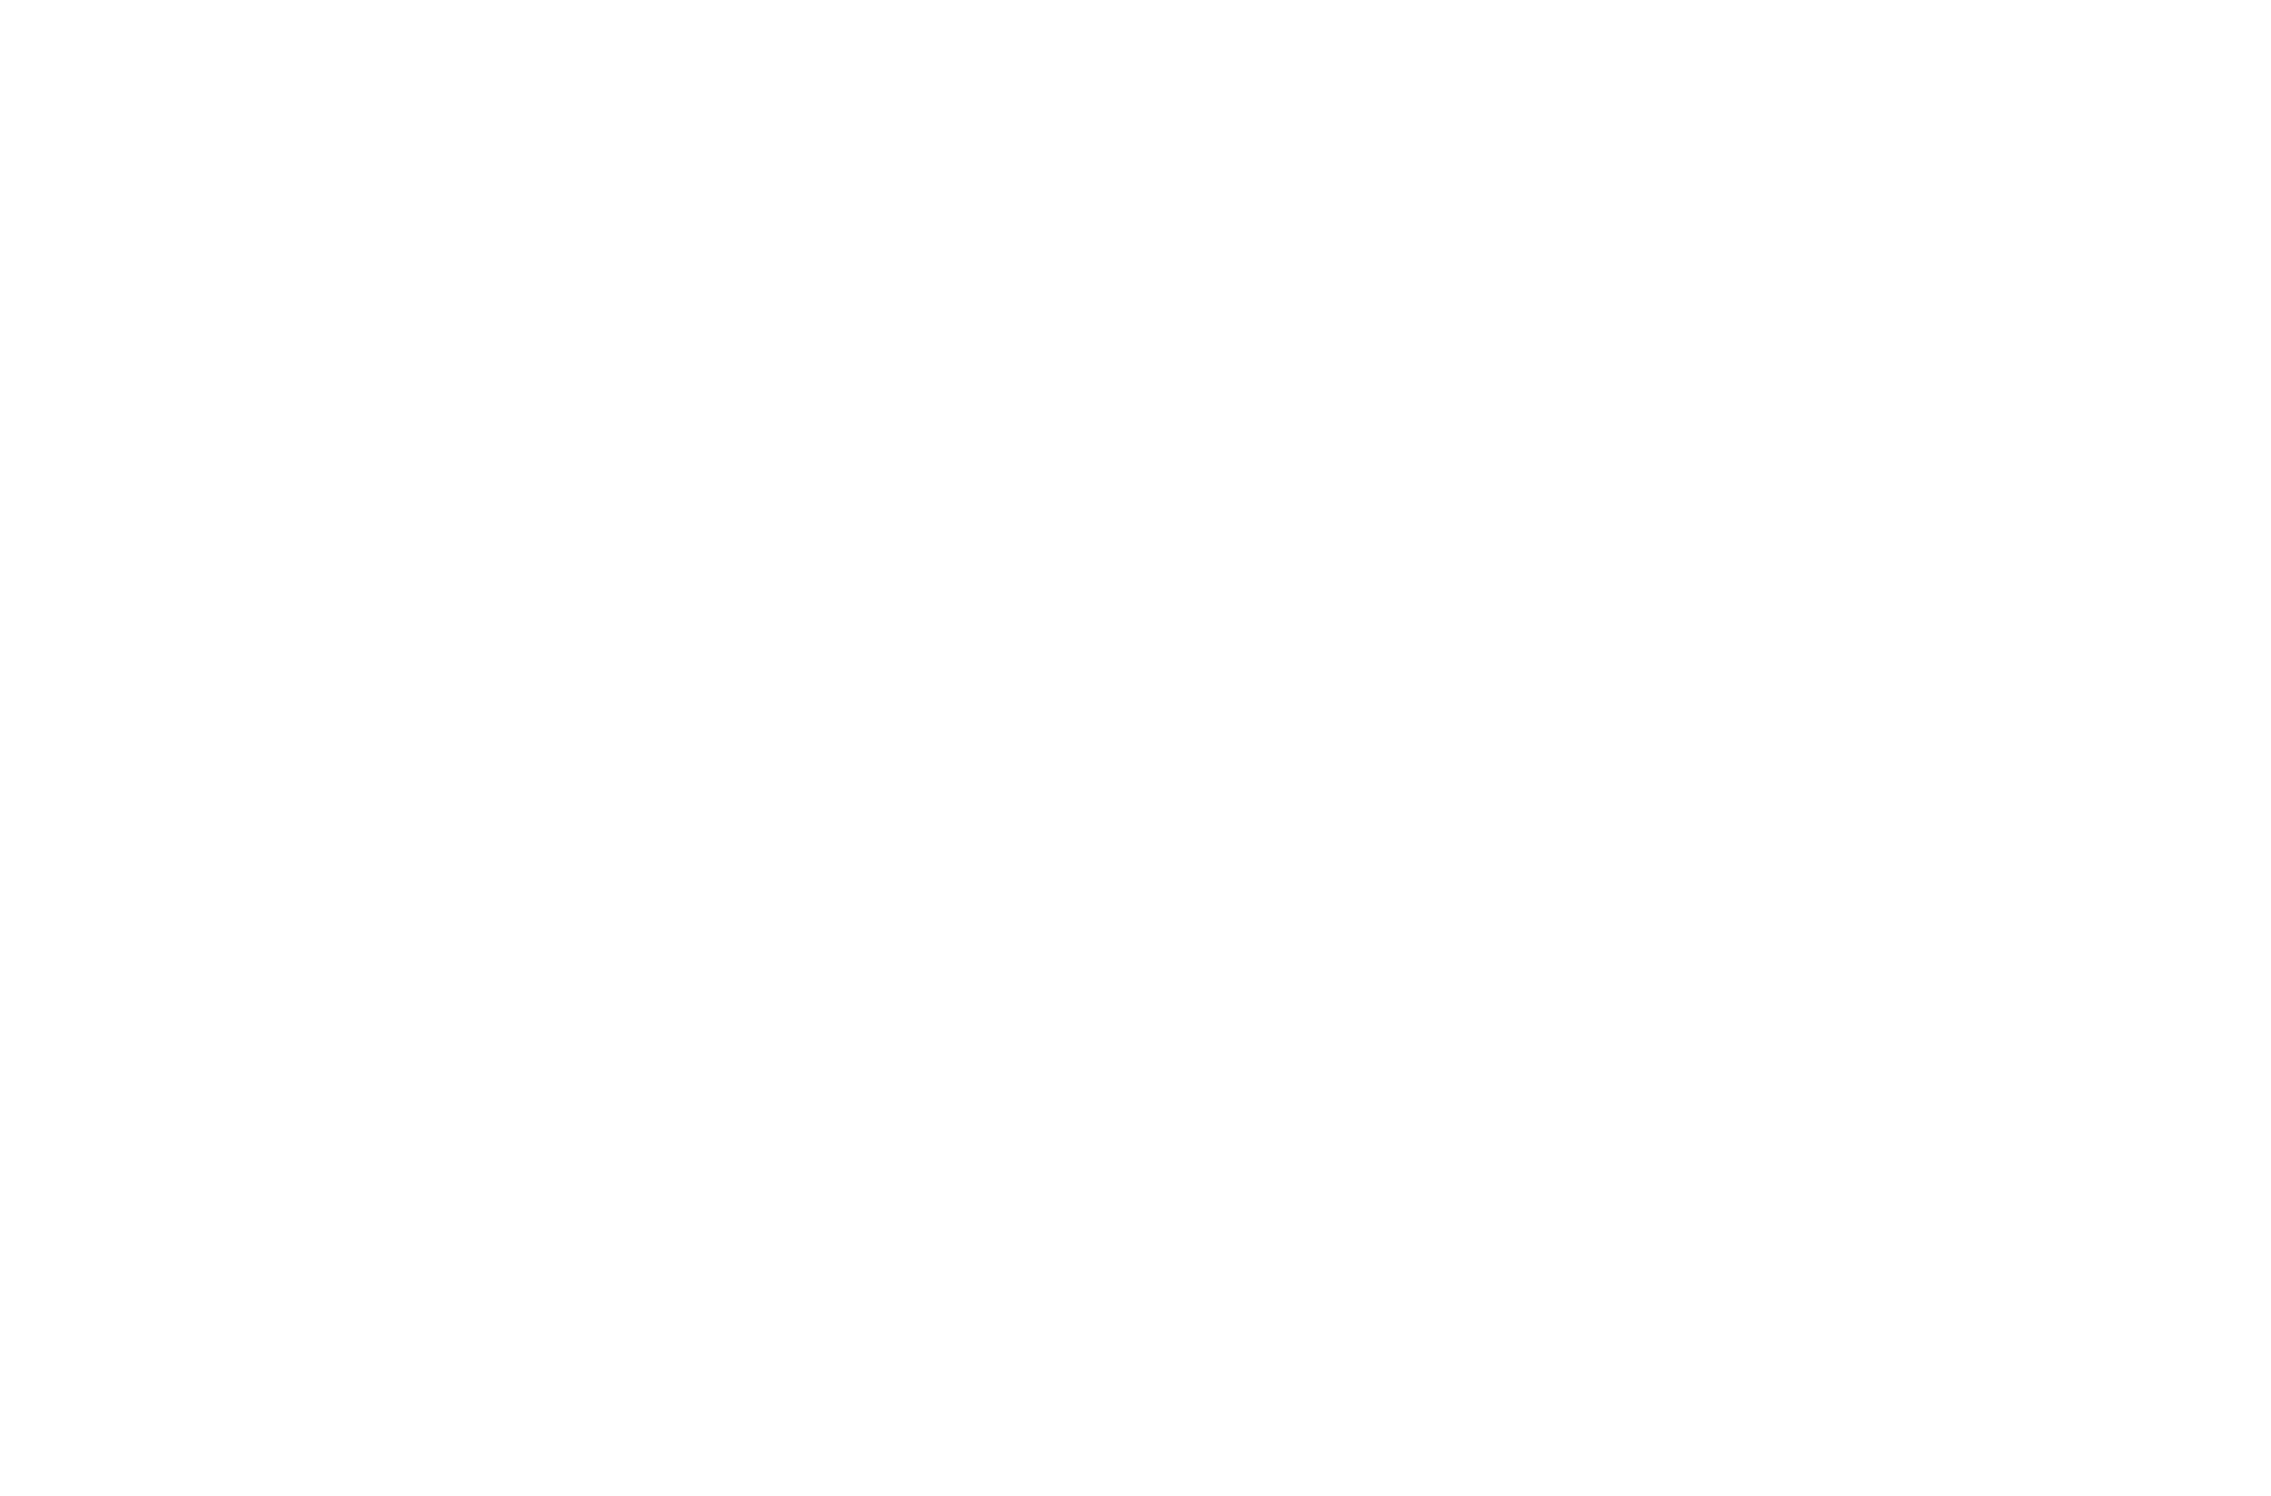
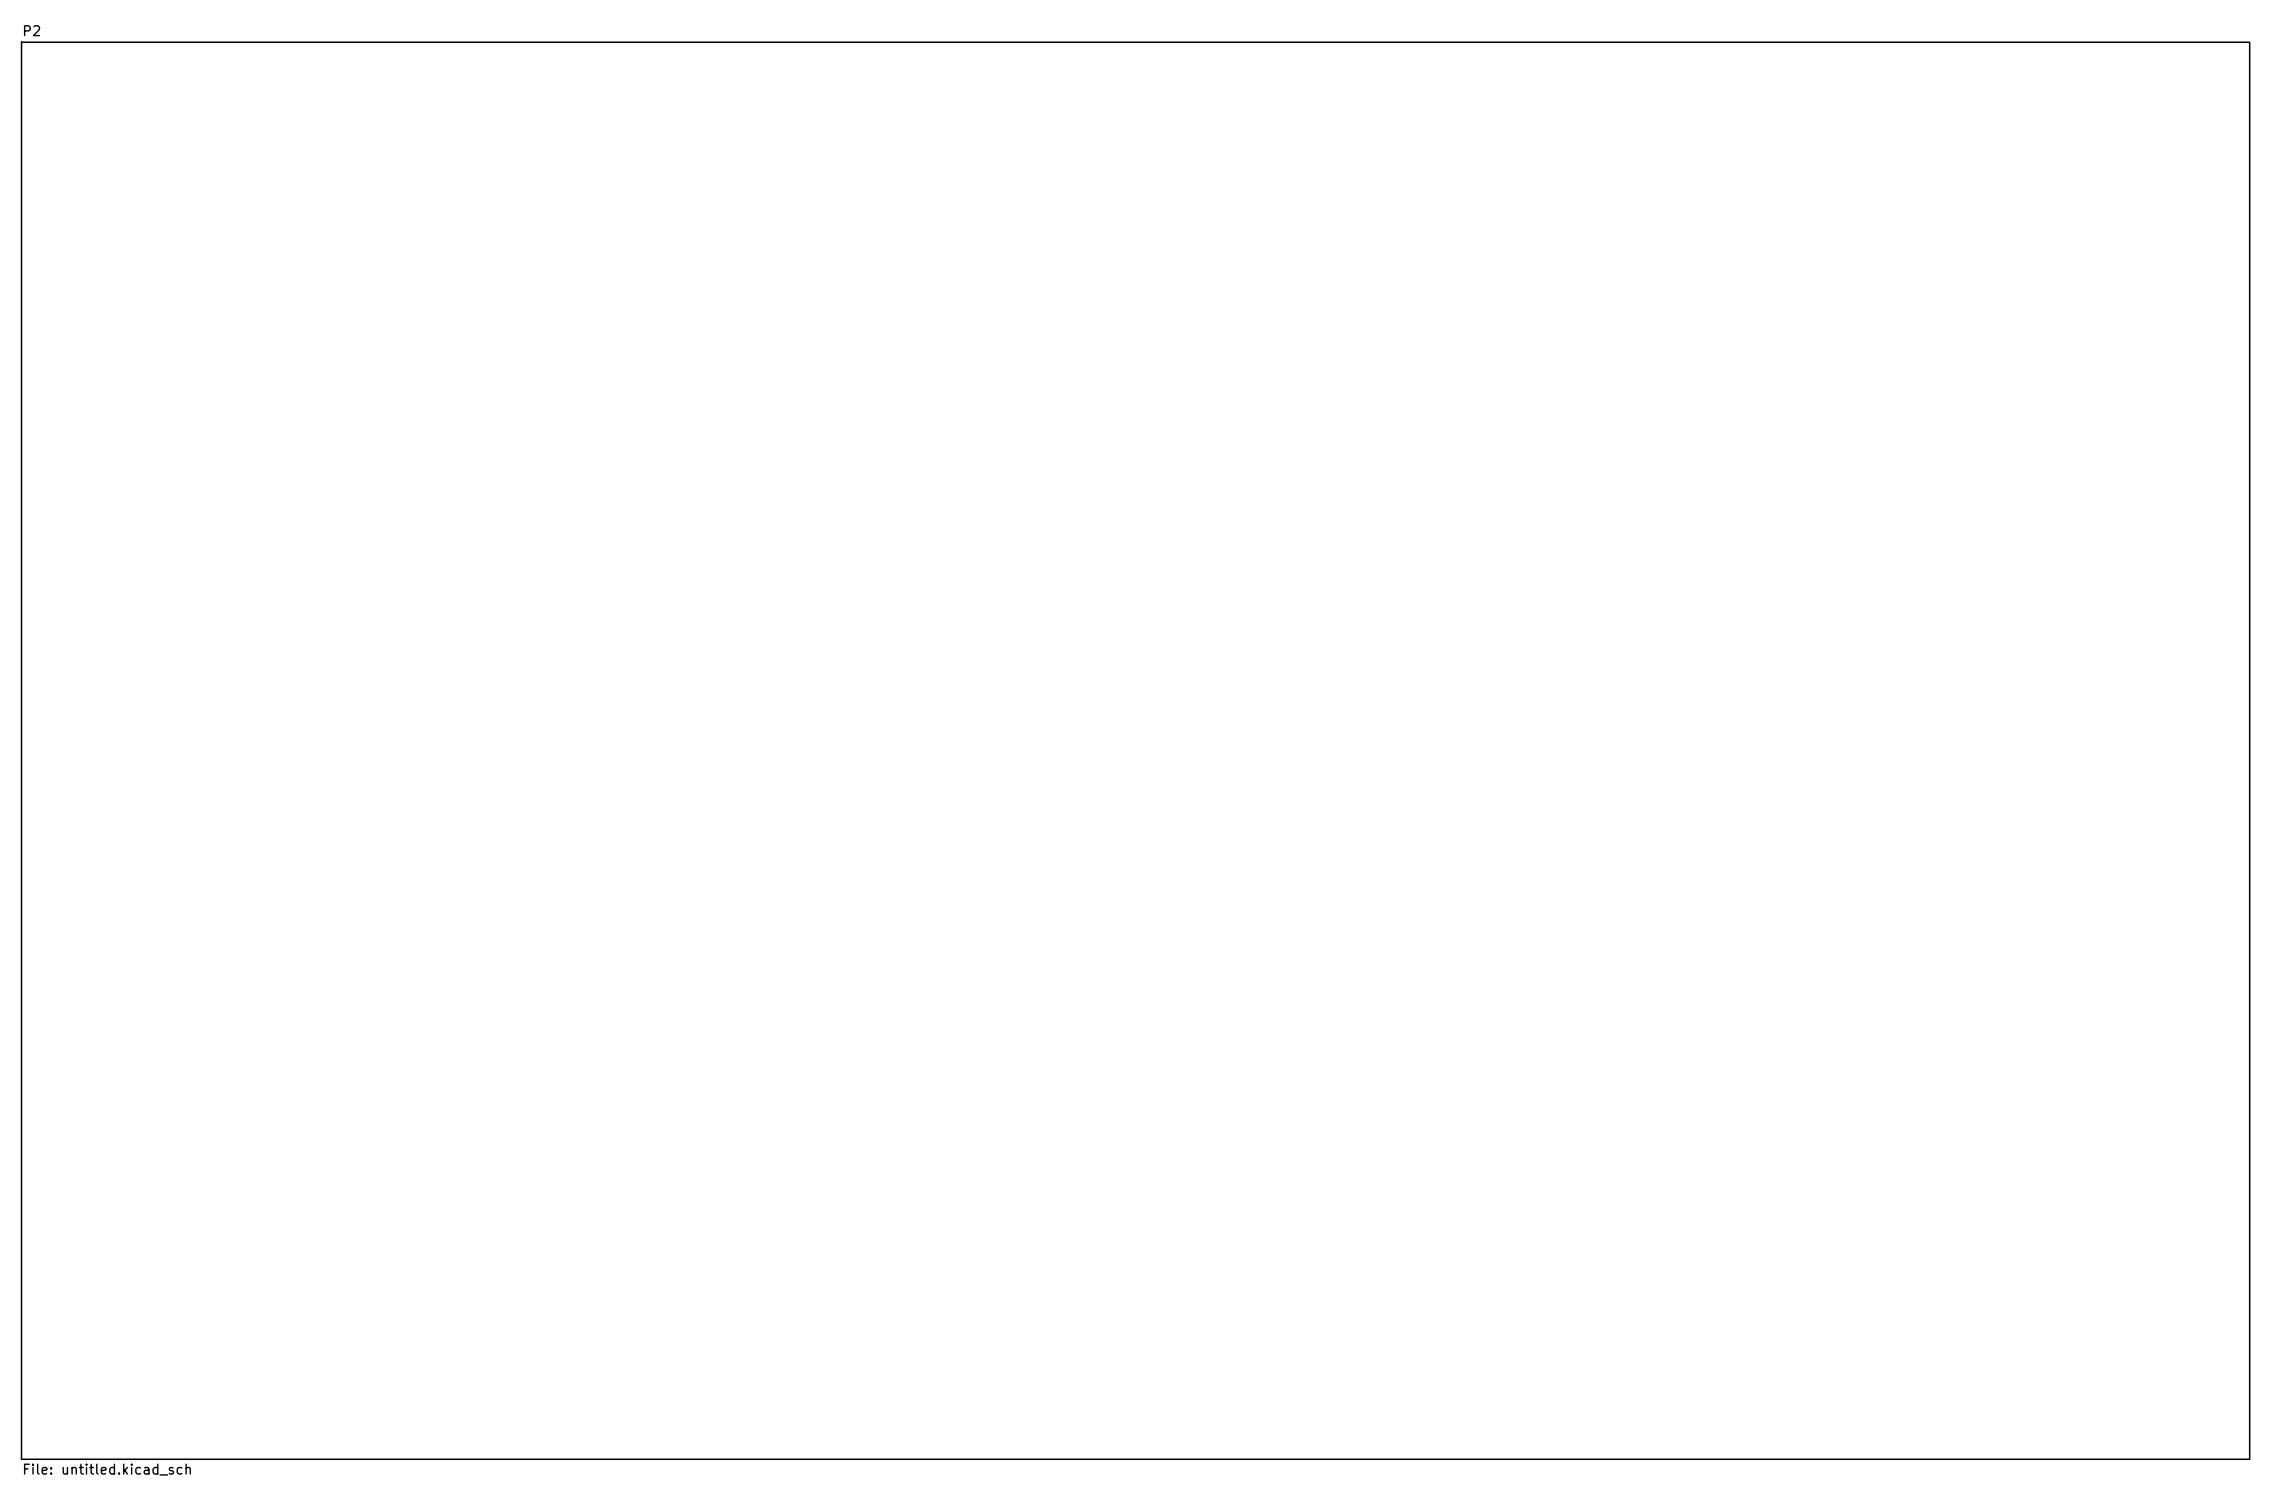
sheet P2: none -> File: untitled.kicad_sch (1135, 750)

